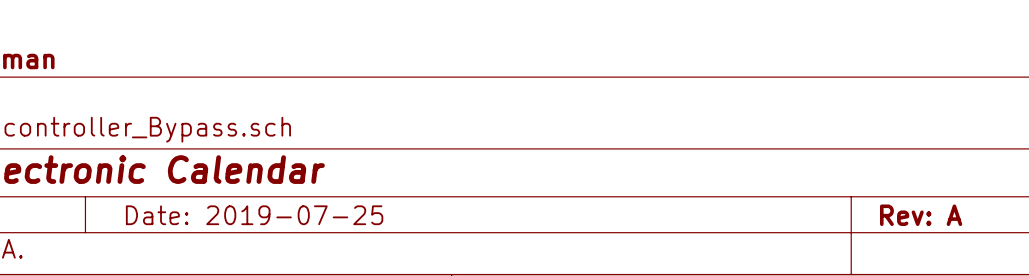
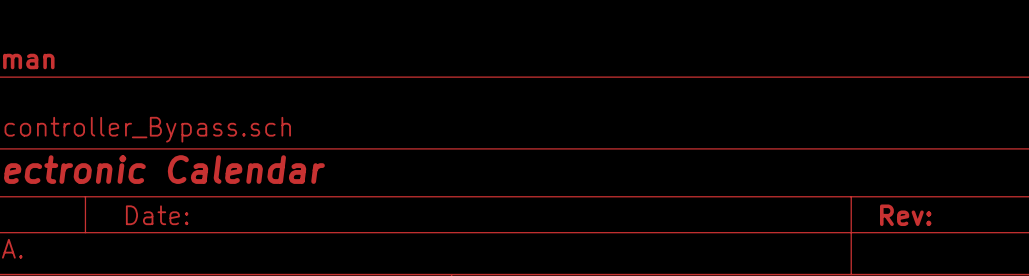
title block: Date: 2019-07-25 (254, 215) -> Date: (157, 215)
title block: Rev: A (921, 215) -> Rev: (905, 215)

